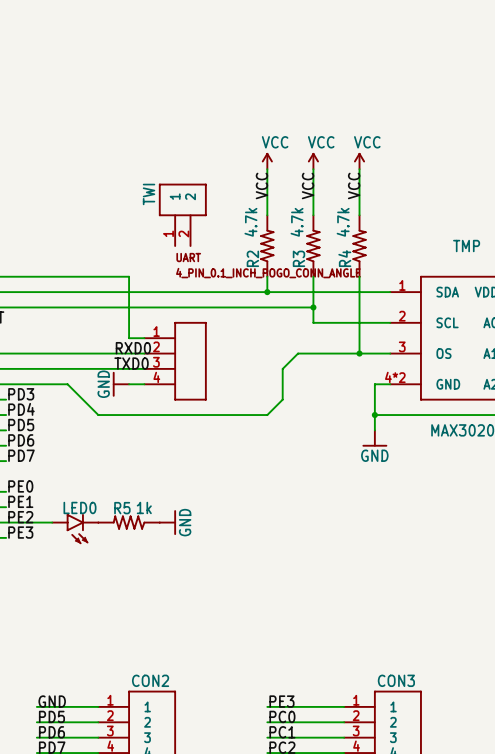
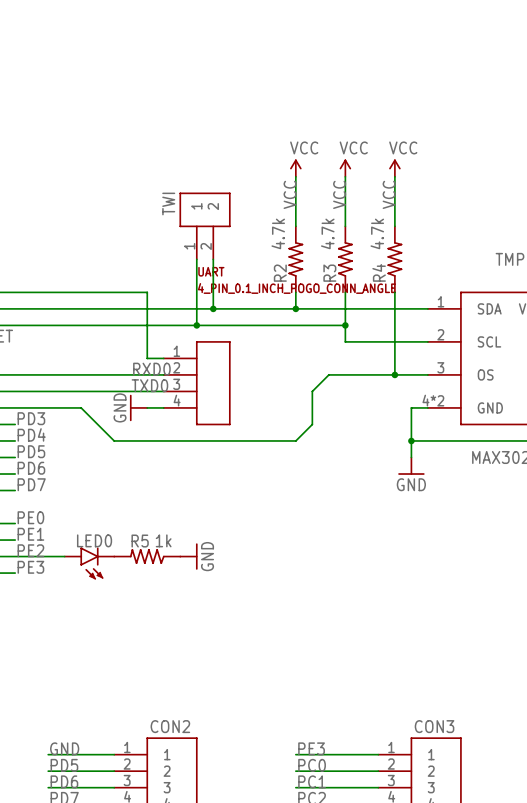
wire: none -> (196, 259) (196, 325)
wire: none -> (213, 259) (213, 308)
junction: none -> (213, 308)
junction: none -> (196, 325)

